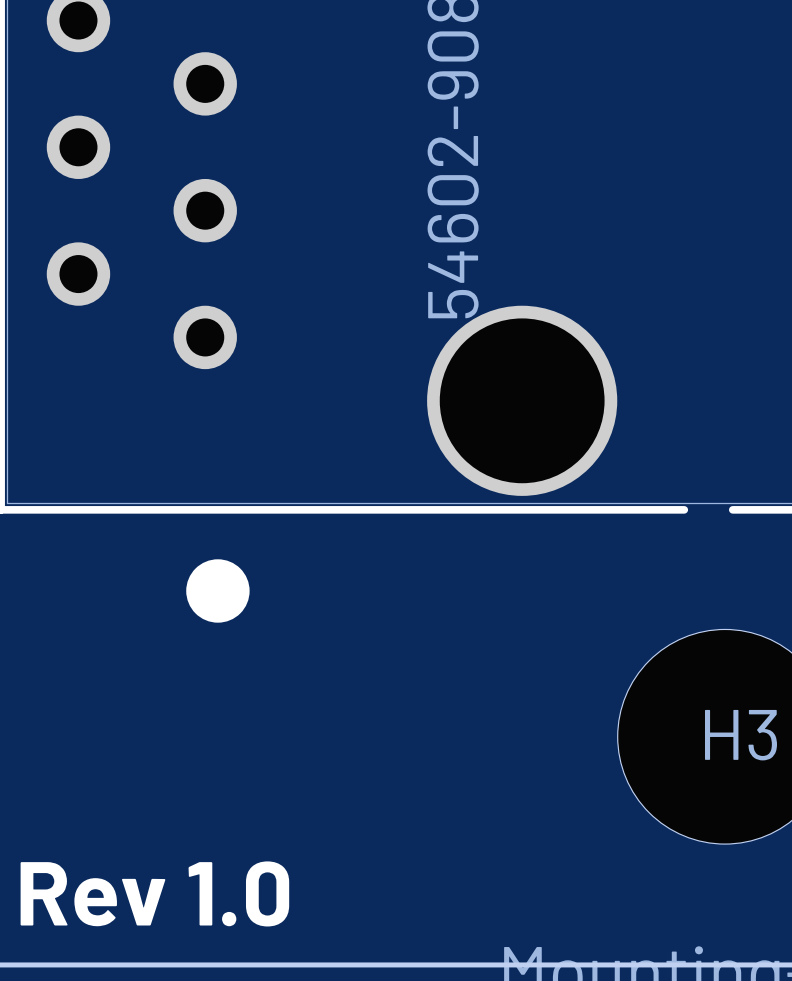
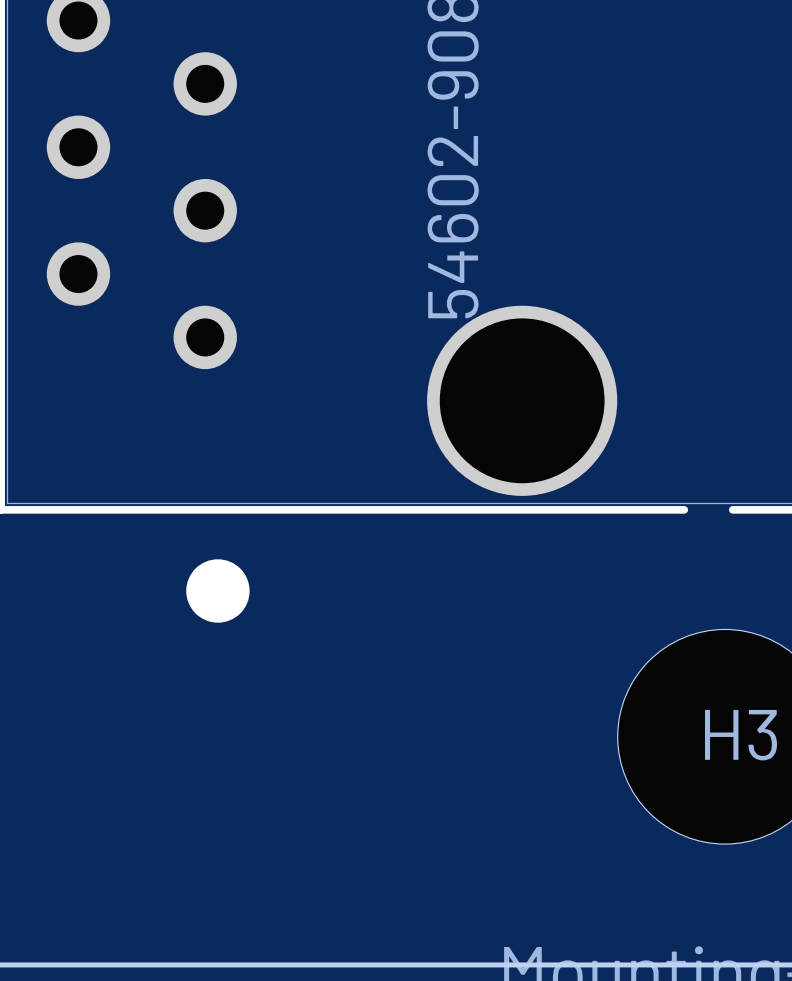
text: Rev 1.0 (154, 893) -> none

